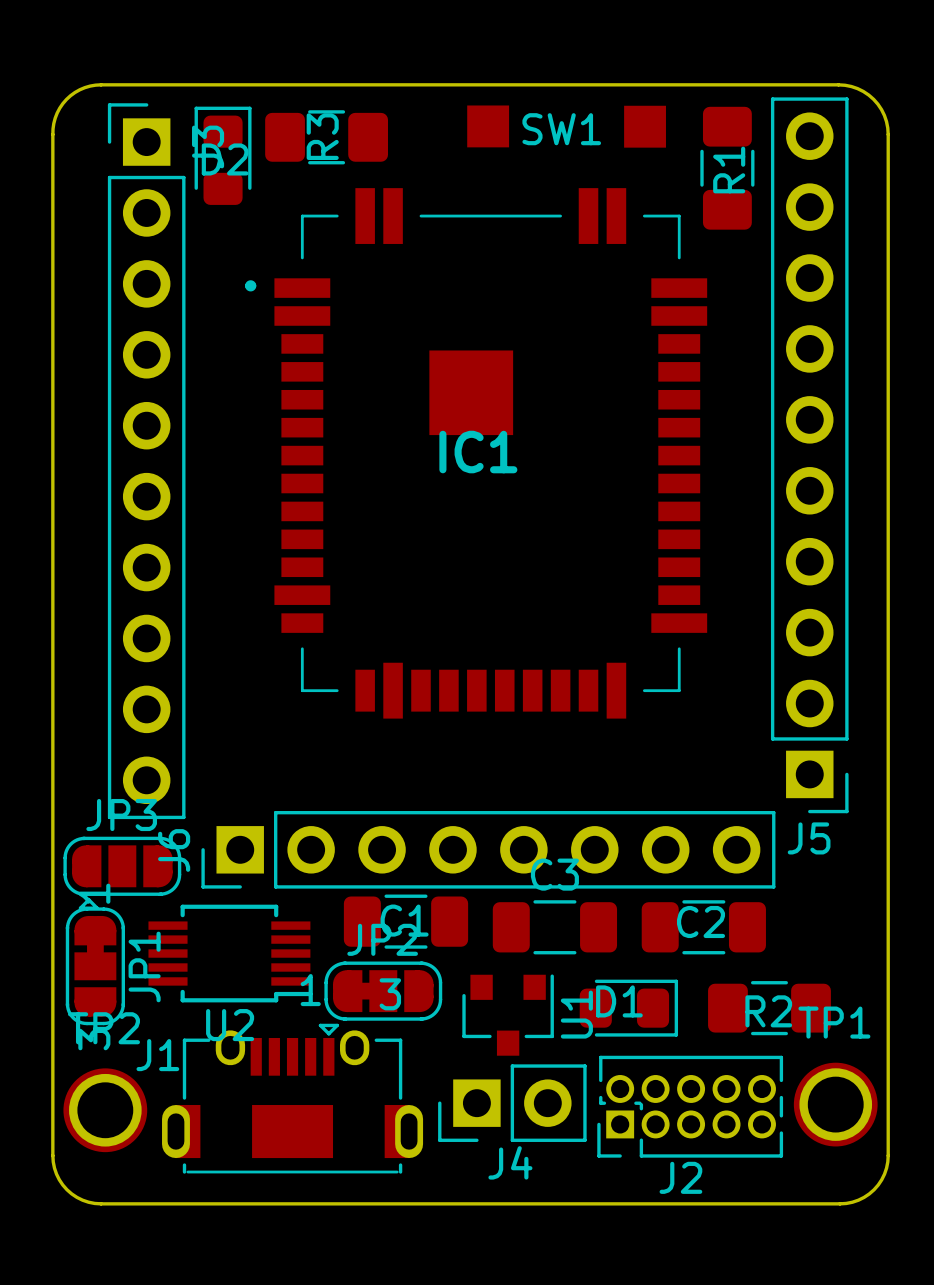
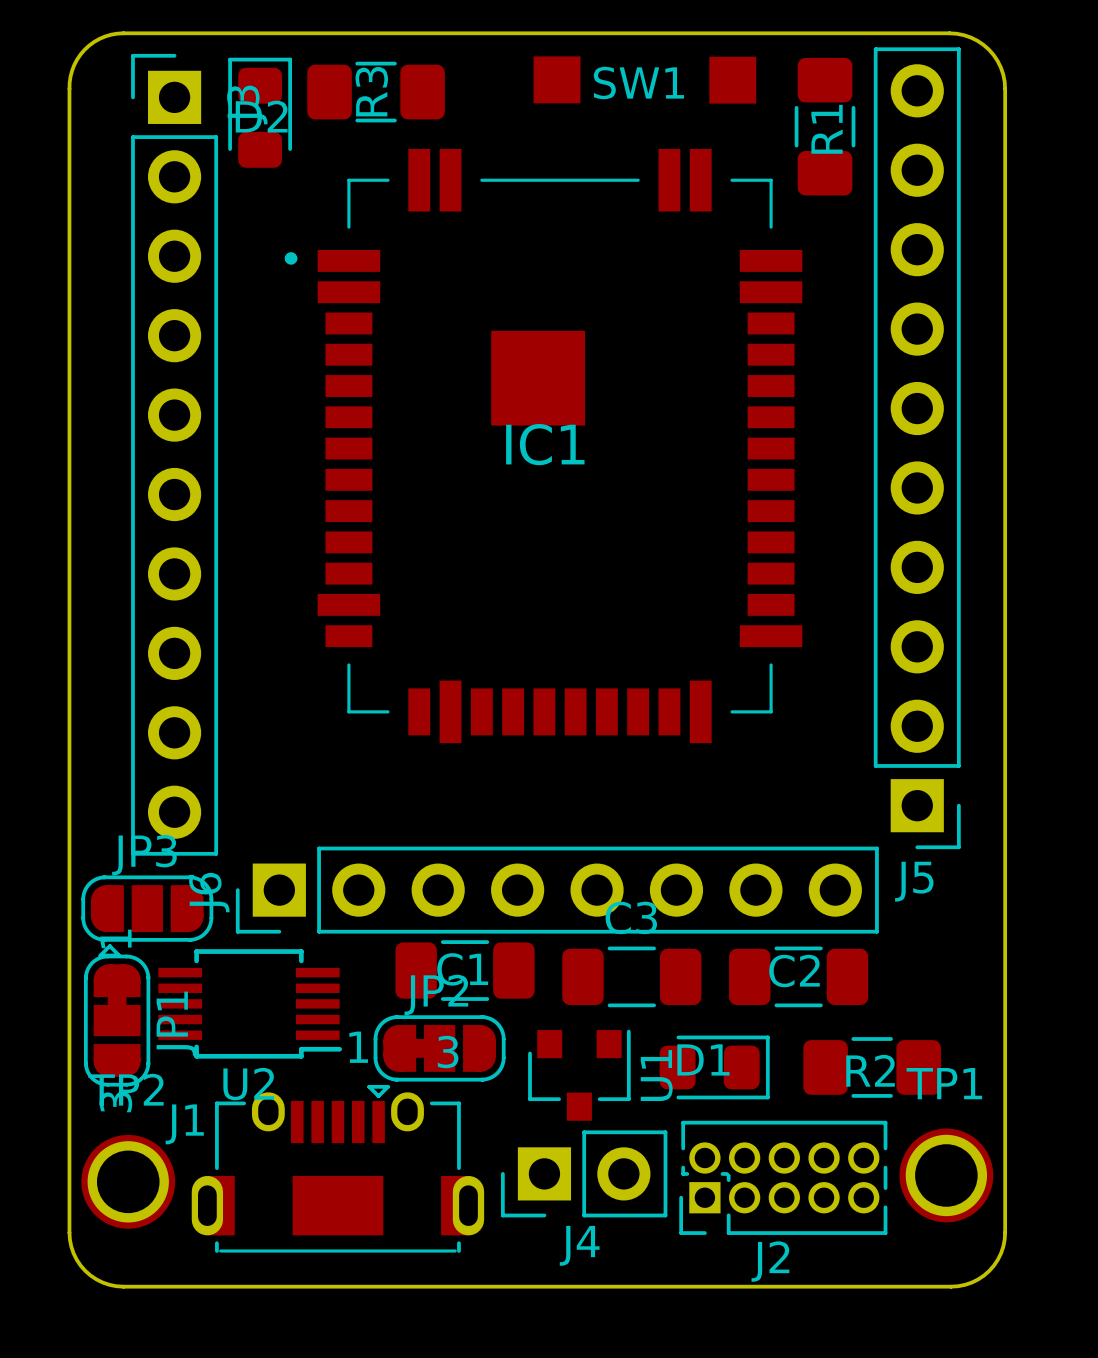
U2 position: (230, 953) -> (250, 1003)

